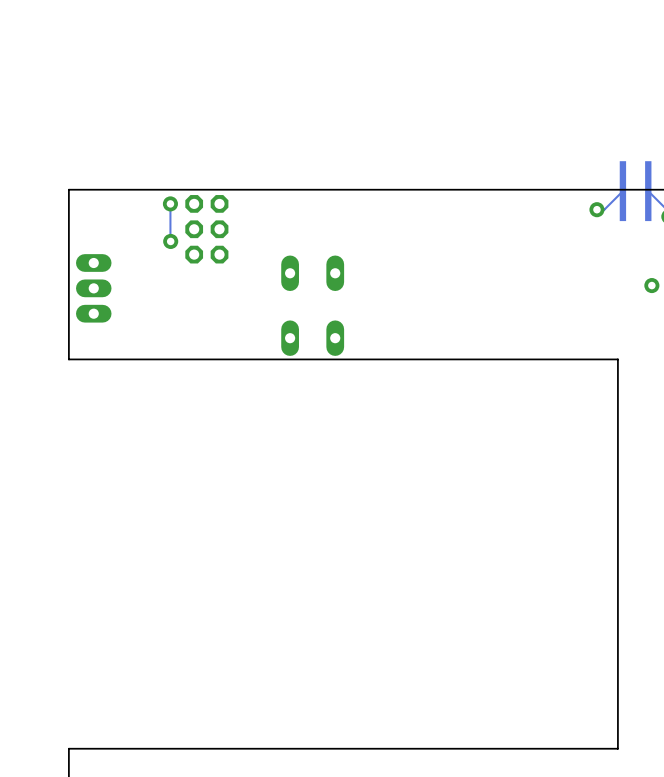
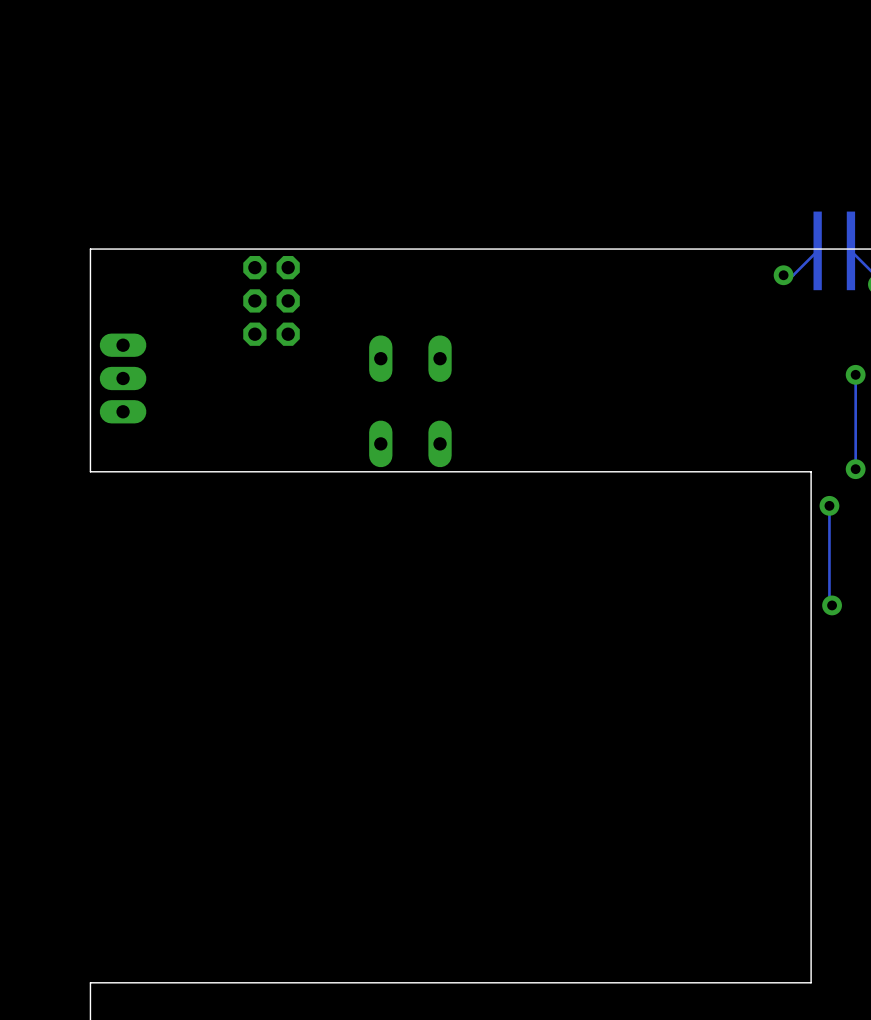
track: (170, 203) (170, 241) -> none
via: (170, 203) -> none
via: (170, 241) -> none
track: none -> (855, 374) (855, 469)
via: none -> (855, 469)
track: none -> (829, 505) (829, 602) (832, 605)
via: none -> (829, 505)
via: none -> (832, 605)

